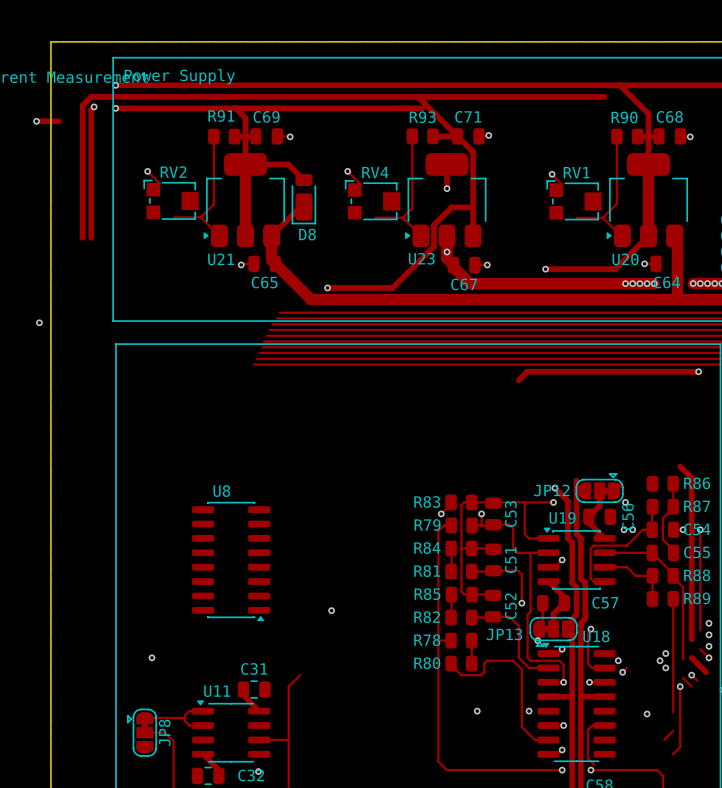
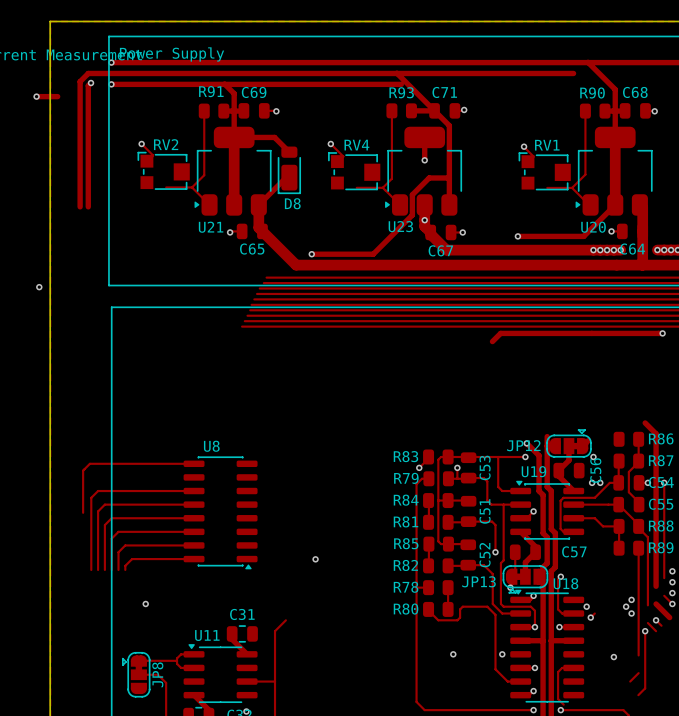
track: none -> (194, 463) (89, 463) (83, 470) (83, 512)
track: none -> (194, 491) (98, 491) (91, 497) (91, 569)
track: none -> (194, 504) (104, 504) (98, 511) (98, 569)
track: none -> (194, 518) (111, 518) (104, 525) (104, 569)
track: none -> (194, 531) (118, 531) (111, 538) (111, 569)
track: none -> (194, 545) (125, 545) (118, 552) (118, 569)
track: none -> (194, 559) (132, 559) (125, 565) (125, 569)

